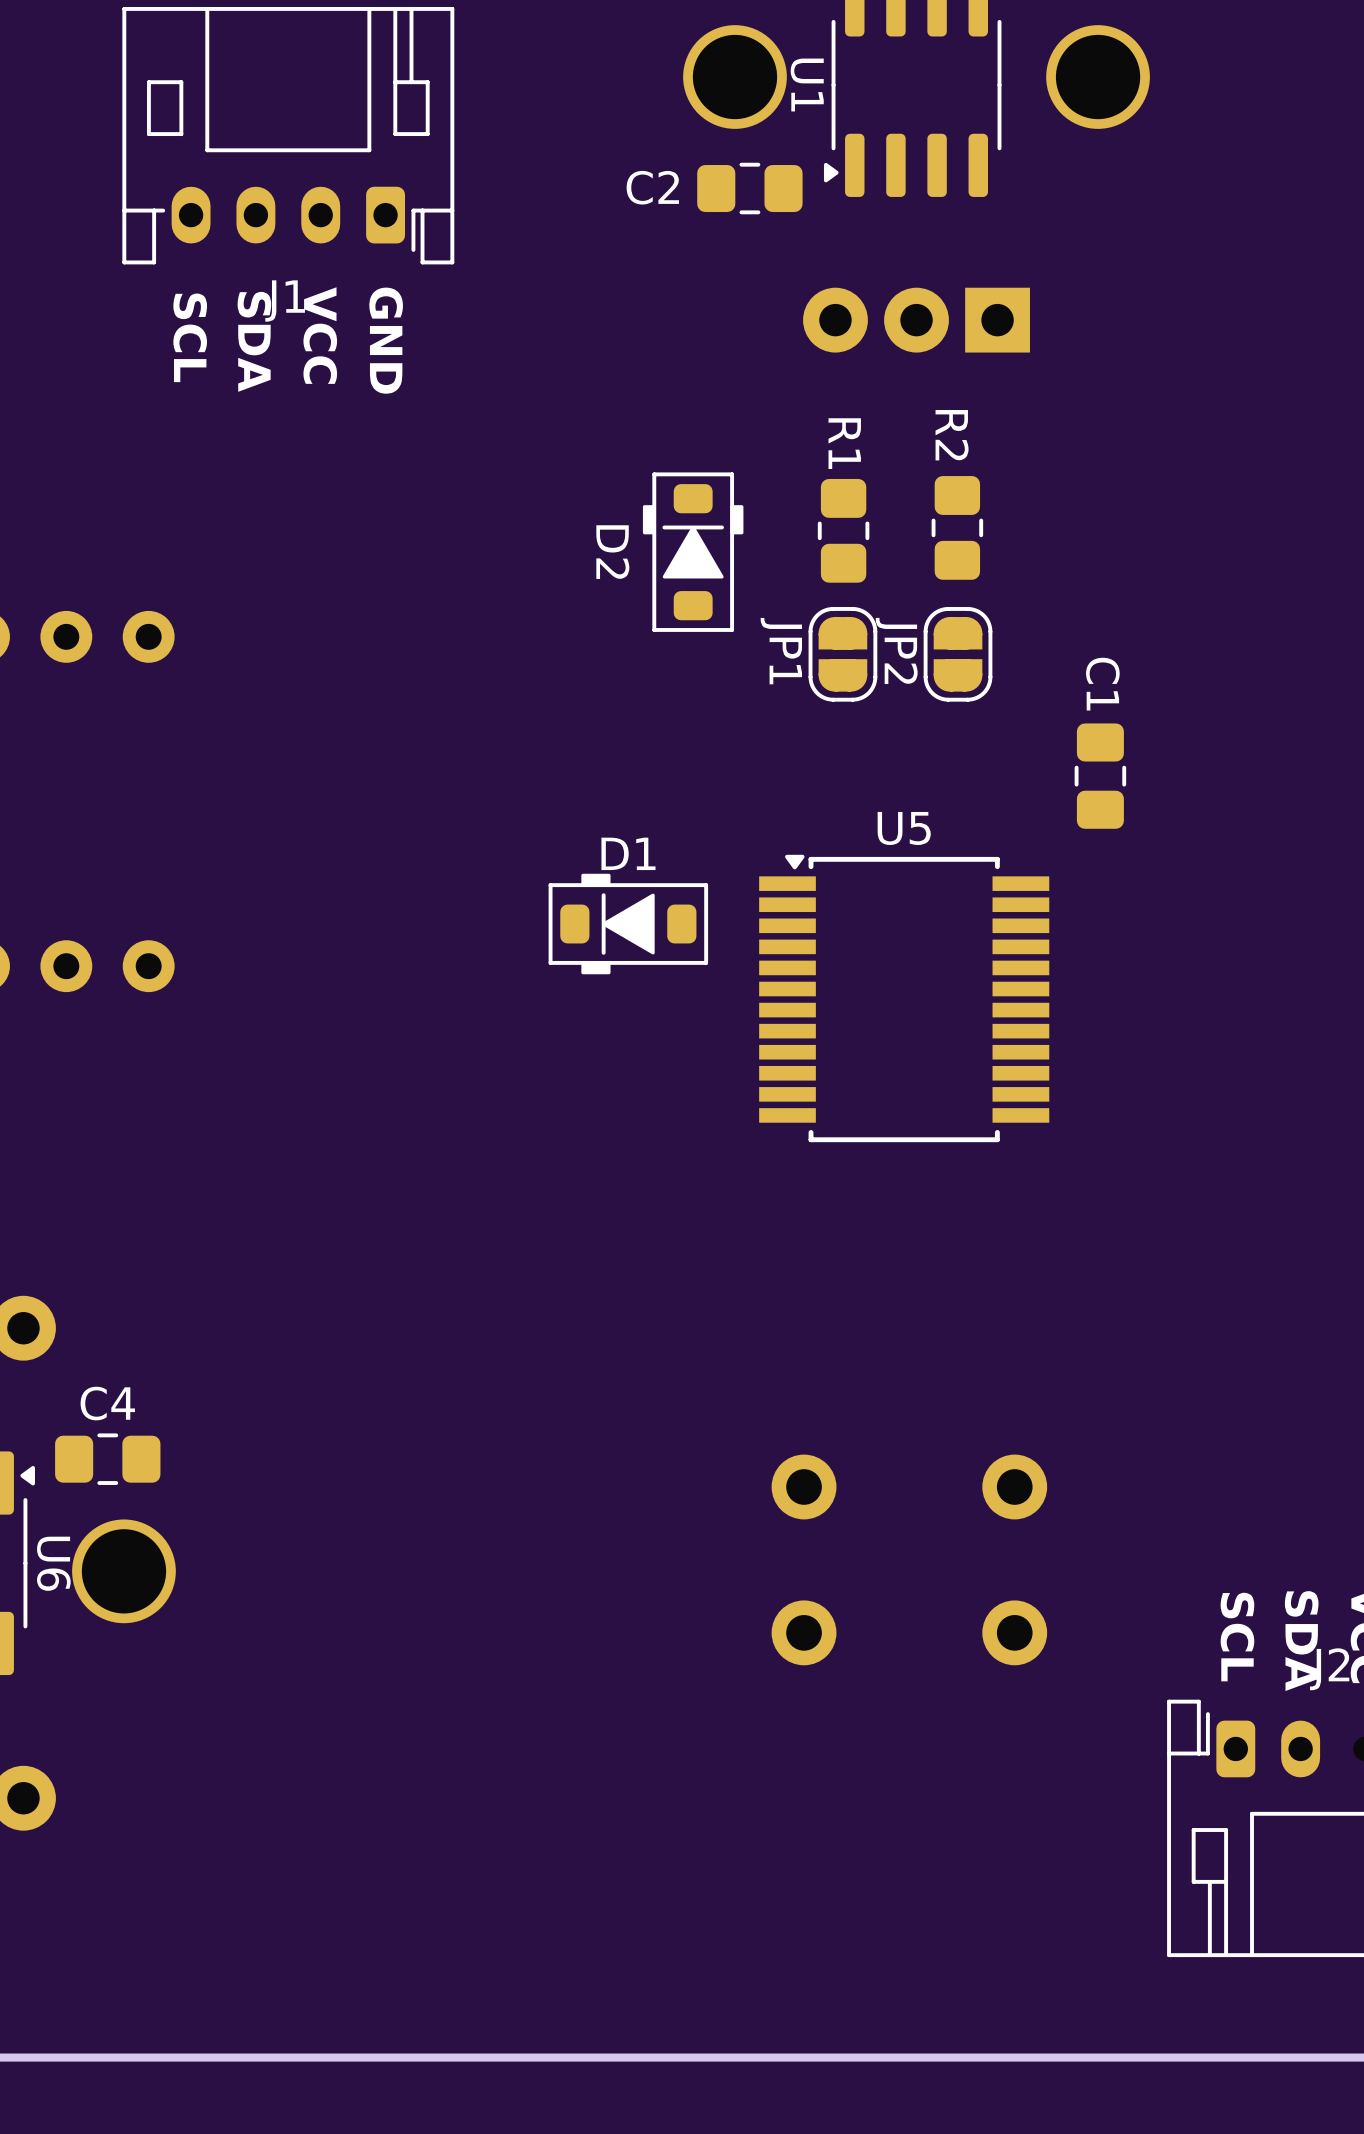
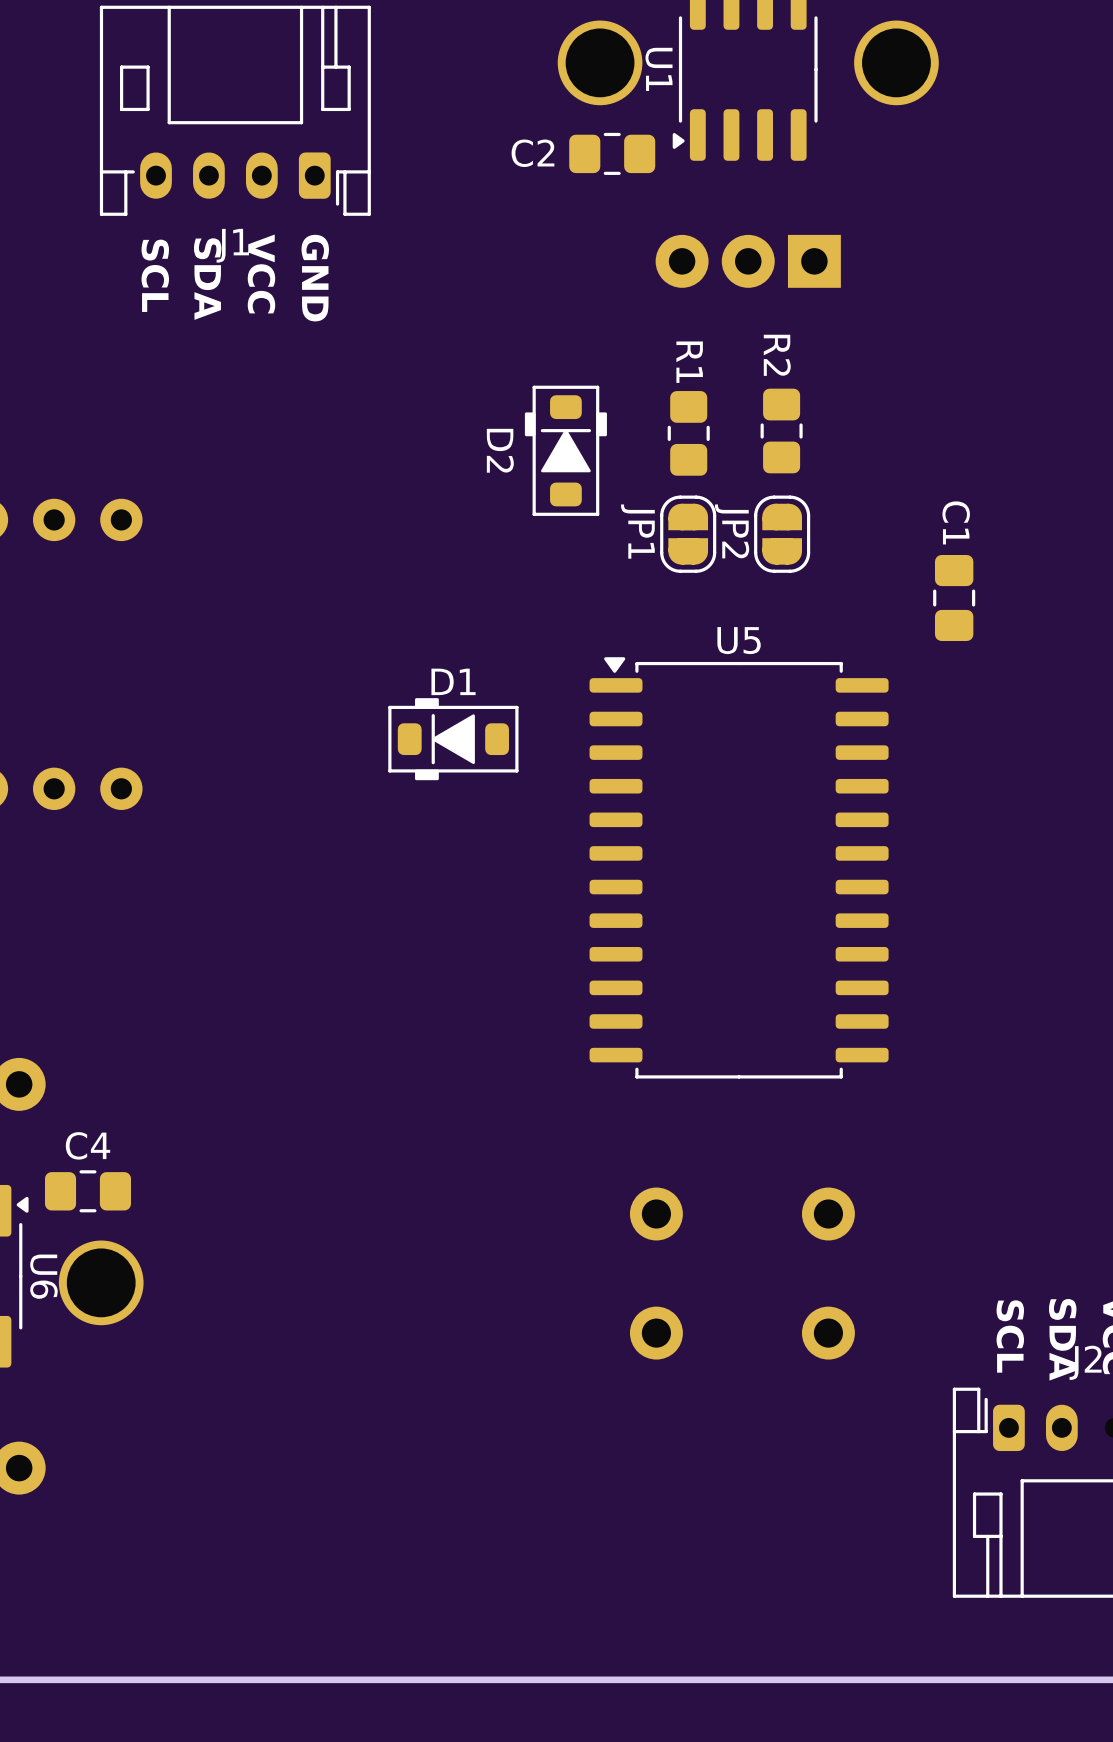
C1 position: (1100, 776) -> (954, 598)
U5 name position: U5 (904, 828) -> U5 (739, 640)
U5 footprint: [759, 854, 1050, 1143] -> [589, 657, 889, 1079]
D1 position: (628, 924) -> (453, 739)

